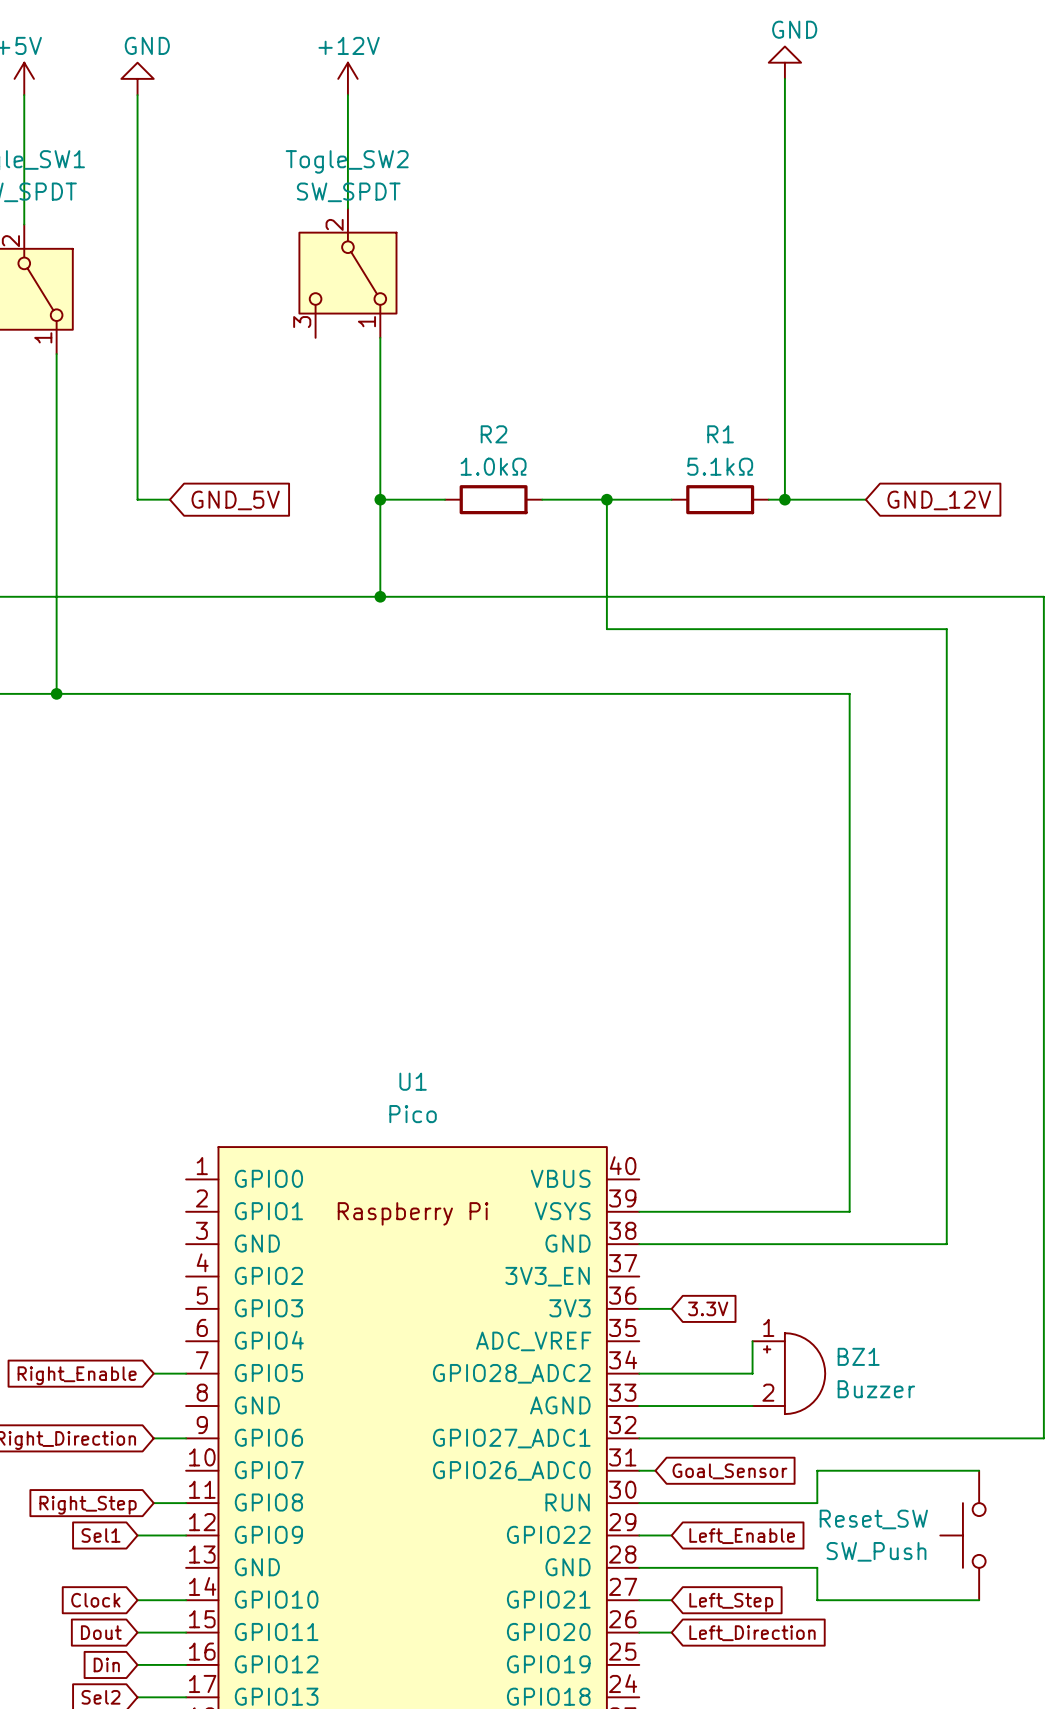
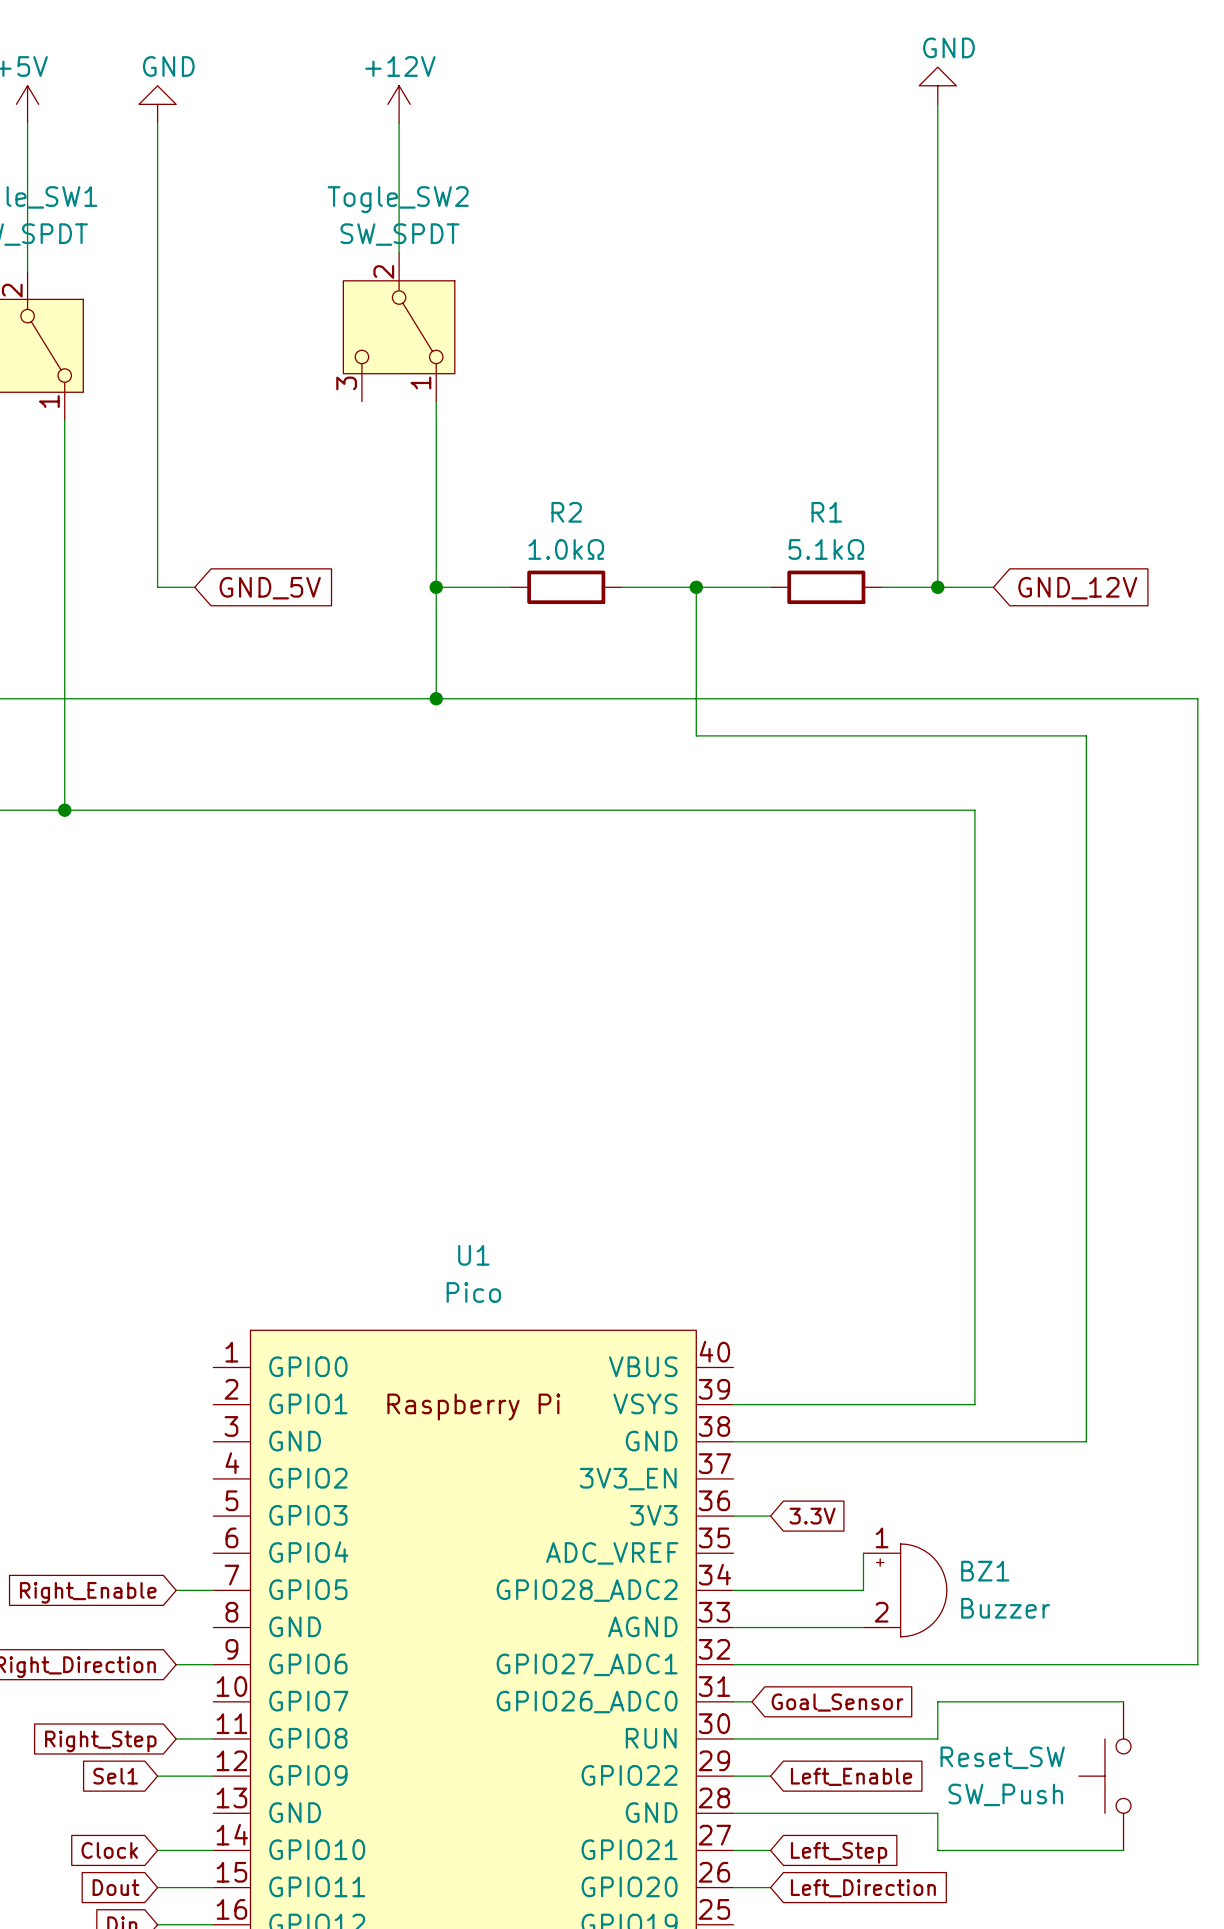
power symbol position: GND (784, 62) -> GND (937, 85)
wire: (784, 78) (784, 499) -> (937, 104) (937, 587)
junction position: (784, 499) -> (937, 587)

